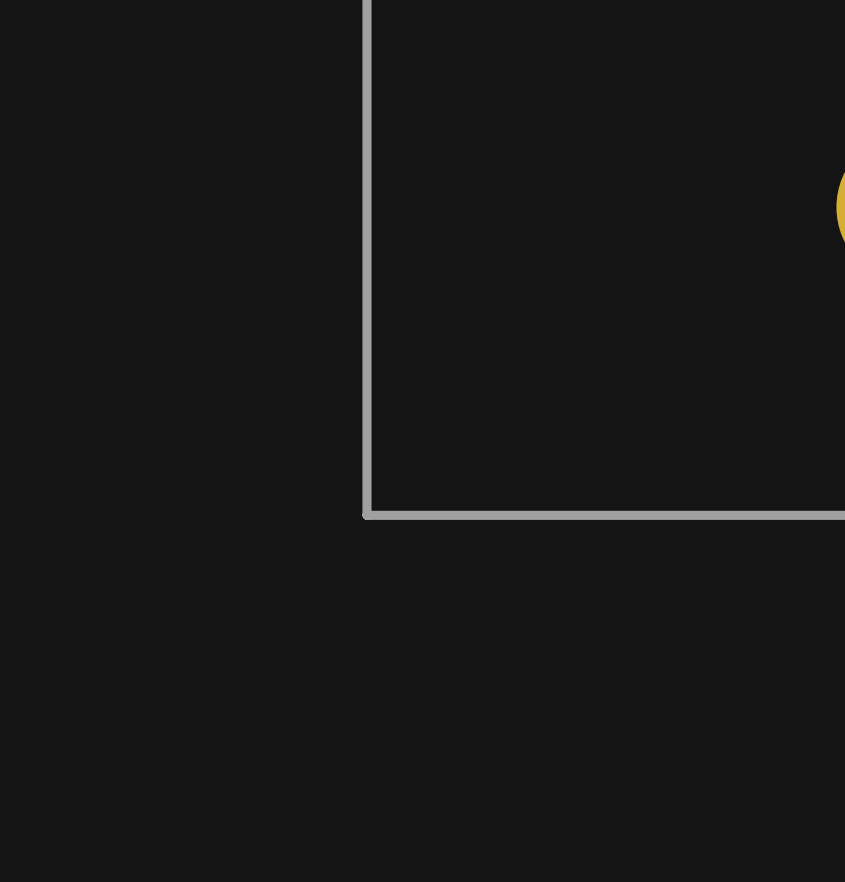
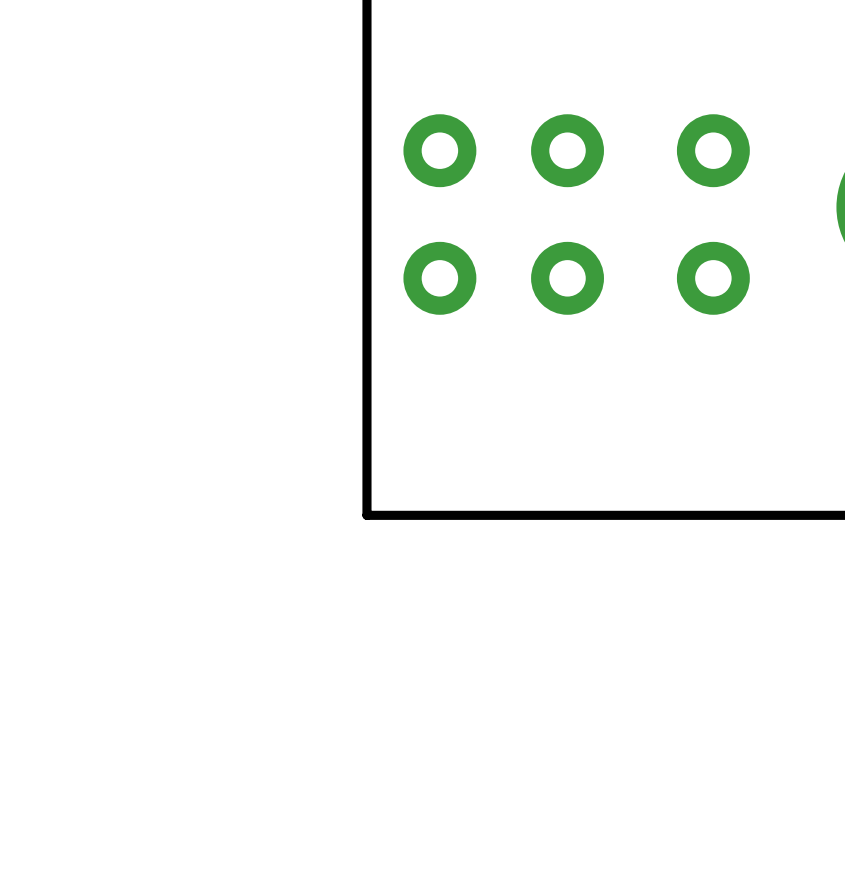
via: none -> (439, 150)
via: none -> (567, 150)
via: none -> (713, 150)
via: none -> (439, 278)
via: none -> (567, 278)
via: none -> (713, 278)

